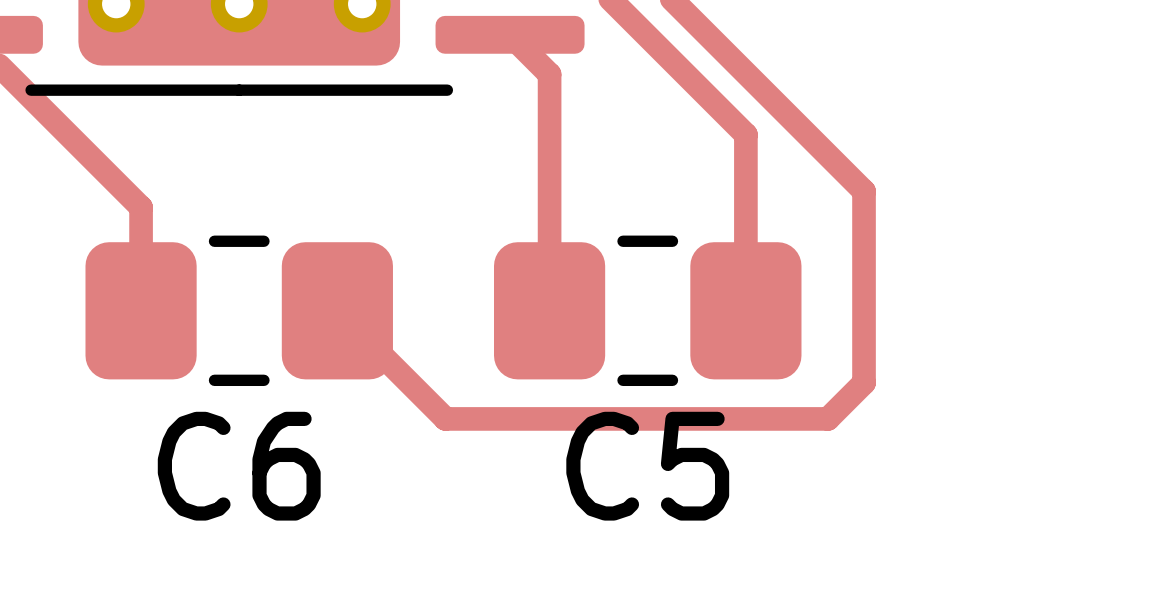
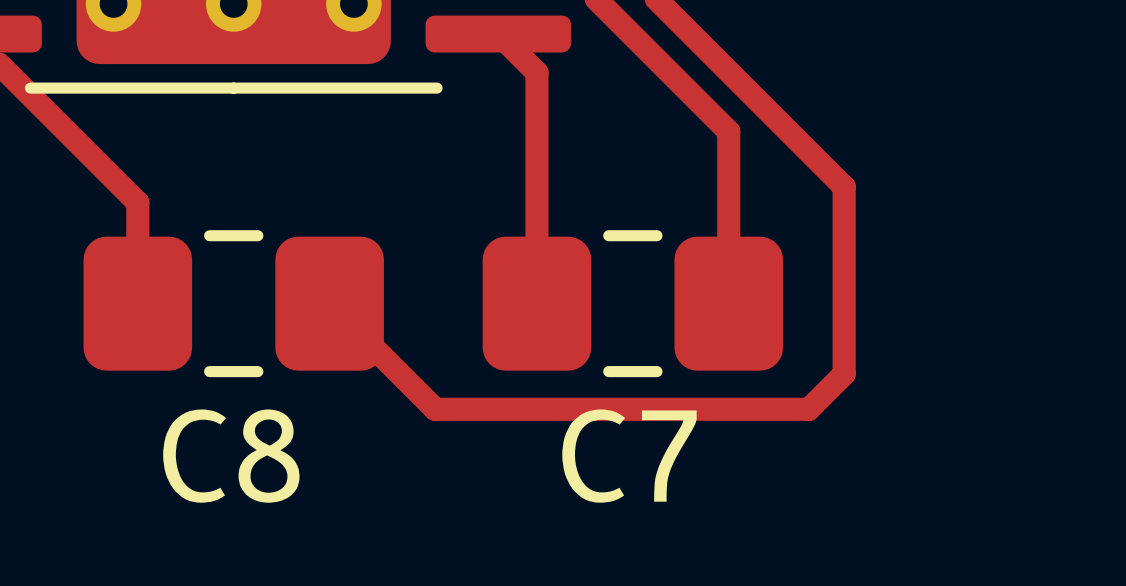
C6 name: C6 (239, 466) -> C8 (231, 456)
C5 name: C5 (647, 466) -> C7 (629, 456)

